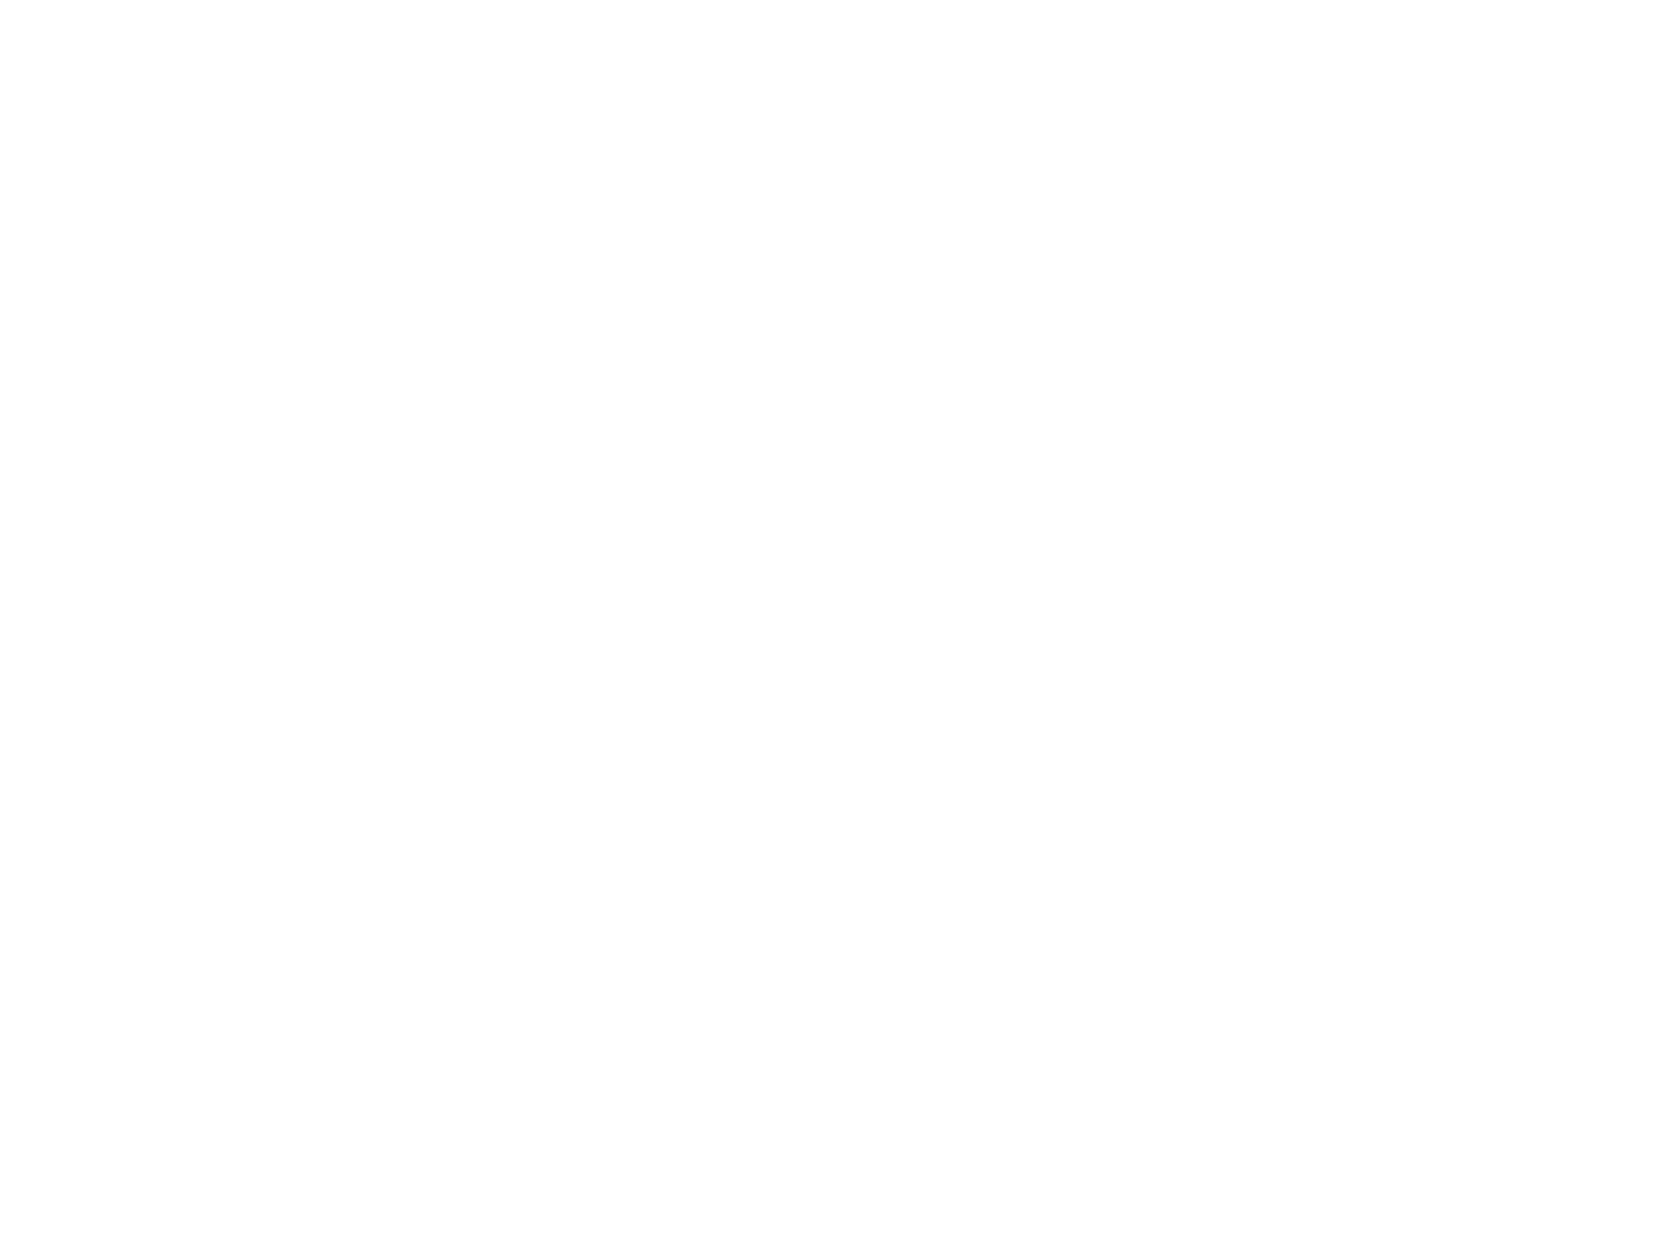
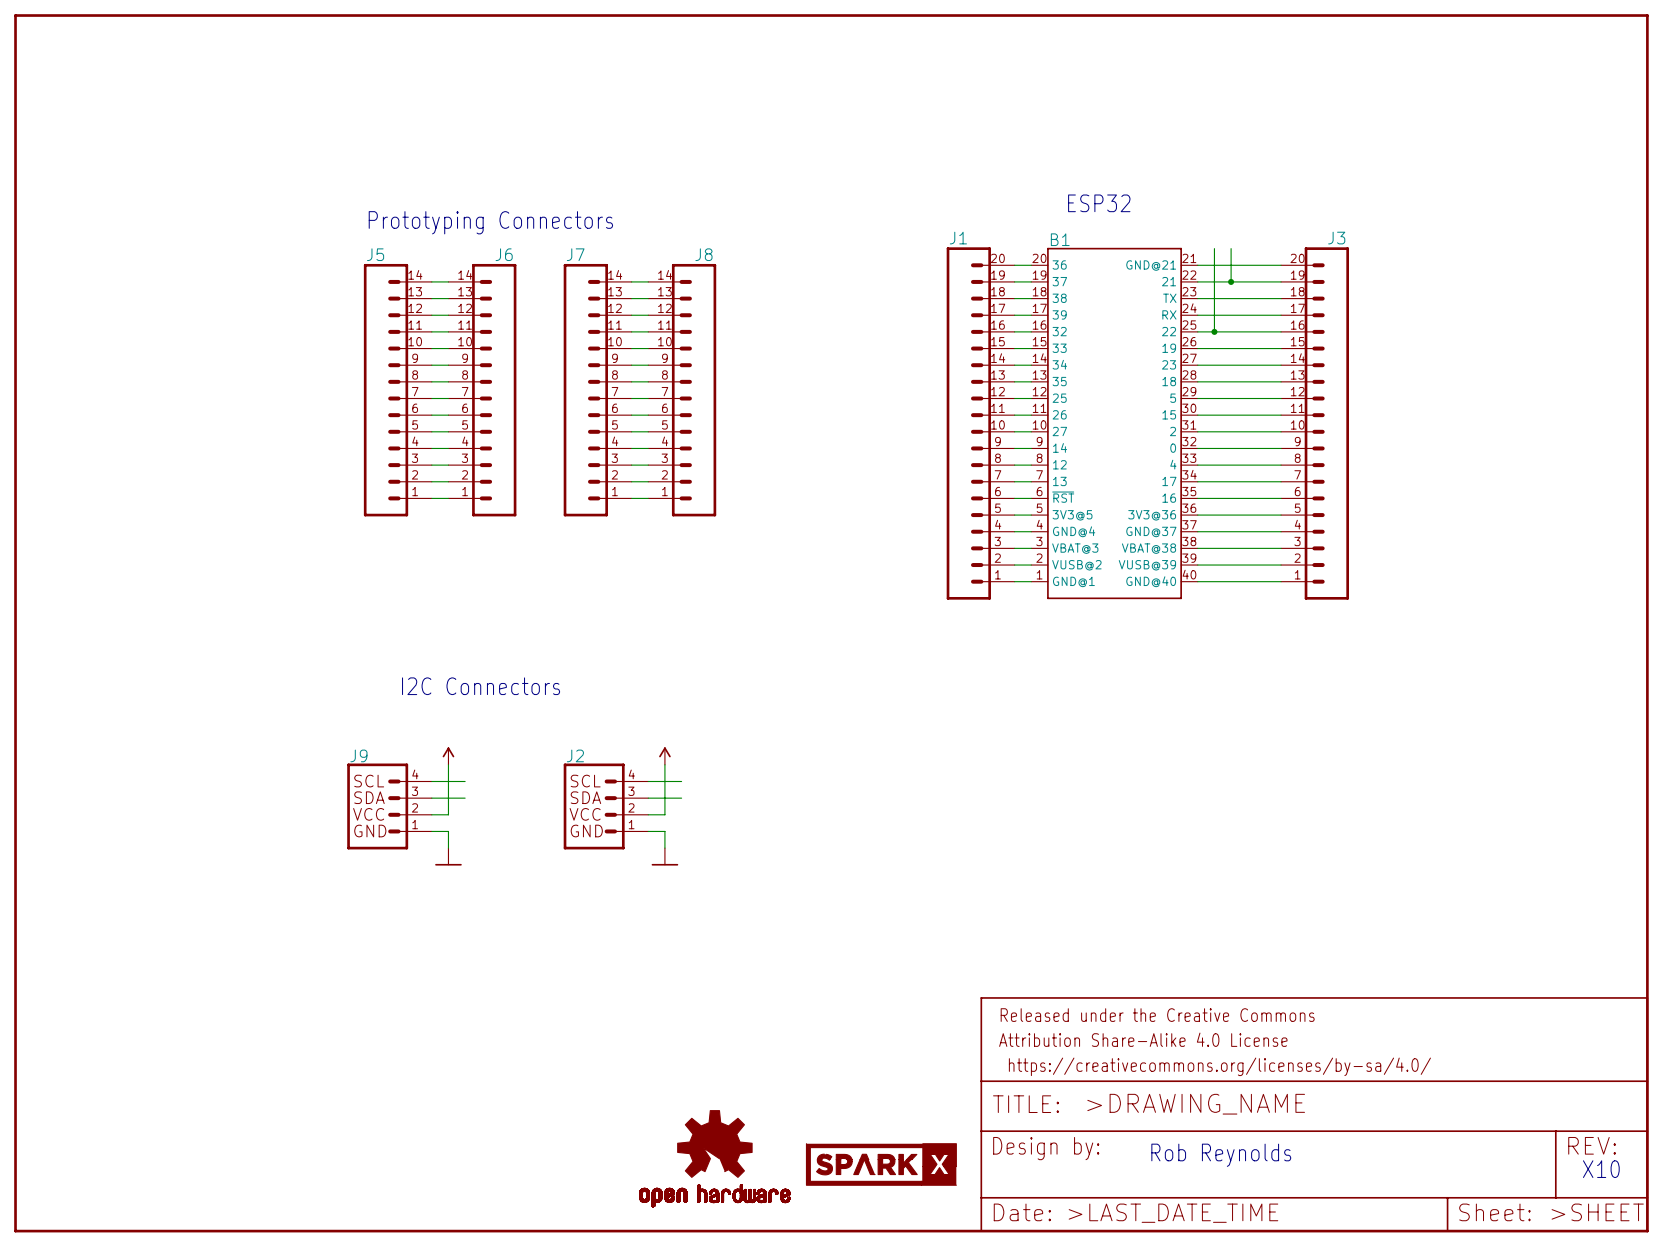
text: none -> ESP32 (1099, 203)
text: none -> Prototyping Connectors (490, 222)
wire: none -> (1214, 248) (1214, 331)
wire: none -> (1231, 248) (1231, 281)
wire: none -> (1014, 265) (1031, 265)
wire: none -> (1197, 265) (1281, 265)
wire: none -> (431, 281) (448, 281)
wire: none -> (631, 281) (648, 281)
wire: none -> (1014, 281) (1031, 281)
wire: none -> (1197, 281) (1281, 281)
junction: none -> (1231, 281)
wire: none -> (431, 298) (448, 298)
wire: none -> (631, 298) (648, 298)
wire: none -> (1014, 298) (1031, 298)
wire: none -> (1197, 298) (1281, 298)
wire: none -> (431, 315) (448, 315)
wire: none -> (631, 315) (648, 315)
wire: none -> (1014, 315) (1031, 315)
wire: none -> (1197, 315) (1281, 315)
wire: none -> (431, 331) (448, 331)
wire: none -> (631, 331) (648, 331)
wire: none -> (1014, 331) (1031, 331)
wire: none -> (1197, 331) (1281, 331)
junction: none -> (1214, 331)
wire: none -> (431, 348) (448, 348)
wire: none -> (631, 348) (648, 348)
wire: none -> (1014, 348) (1031, 348)
wire: none -> (1197, 348) (1281, 348)
wire: none -> (431, 365) (448, 365)
wire: none -> (631, 365) (648, 365)
wire: none -> (1014, 365) (1031, 365)
wire: none -> (1197, 365) (1281, 365)
wire: none -> (431, 381) (448, 381)
wire: none -> (631, 381) (648, 381)
wire: none -> (1014, 381) (1031, 381)
wire: none -> (1197, 381) (1281, 381)
J5: none -> (397, 390)
J6: none -> (482, 390)
J7: none -> (597, 390)
J8: none -> (682, 390)
wire: none -> (431, 398) (448, 398)
wire: none -> (631, 398) (648, 398)
wire: none -> (1014, 398) (1031, 398)
wire: none -> (1197, 398) (1281, 398)
wire: none -> (431, 415) (448, 415)
wire: none -> (631, 415) (648, 415)
wire: none -> (1014, 415) (1031, 415)
wire: none -> (1197, 415) (1281, 415)
J1: none -> (980, 423)
B1: none -> (1114, 423)
J3: none -> (1315, 423)
wire: none -> (431, 431) (448, 431)
wire: none -> (631, 431) (648, 431)
wire: none -> (1014, 431) (1031, 431)
wire: none -> (1197, 431) (1281, 431)
wire: none -> (431, 448) (448, 448)
wire: none -> (631, 448) (648, 448)
wire: none -> (1014, 448) (1031, 448)
wire: none -> (1197, 448) (1281, 448)
wire: none -> (431, 465) (448, 465)
wire: none -> (631, 465) (648, 465)
wire: none -> (1014, 465) (1031, 465)
wire: none -> (1197, 465) (1281, 465)
wire: none -> (431, 481) (448, 481)
wire: none -> (631, 481) (648, 481)
wire: none -> (1014, 481) (1031, 481)
wire: none -> (1197, 481) (1281, 481)
wire: none -> (431, 498) (448, 498)
wire: none -> (631, 498) (648, 498)
wire: none -> (1014, 498) (1031, 498)
wire: none -> (1197, 498) (1281, 498)
wire: none -> (1014, 515) (1031, 515)
wire: none -> (1197, 515) (1281, 515)
wire: none -> (1014, 531) (1031, 531)
wire: none -> (1197, 531) (1281, 531)
wire: none -> (1014, 548) (1031, 548)
wire: none -> (1197, 548) (1281, 548)
wire: none -> (1014, 565) (1031, 565)
wire: none -> (1197, 565) (1281, 565)
wire: none -> (1014, 581) (1031, 581)
wire: none -> (1197, 581) (1281, 581)
part: none -> (831, 623)
text: none -> I2C Connectors (481, 686)
power symbol: none -> (448, 756)
power symbol: none -> (664, 756)
wire: none -> (448, 764) (448, 814) (431, 814)
wire: none -> (664, 764) (664, 814) (648, 814)
wire: none -> (431, 781) (465, 781)
wire: none -> (648, 781) (681, 781)
wire: none -> (431, 798) (465, 798)
wire: none -> (648, 798) (681, 798)
J9: none -> (389, 806)
J2: none -> (605, 806)
wire: none -> (431, 831) (448, 831) (448, 848)
wire: none -> (648, 831) (664, 831) (664, 848)
power symbol: none -> (448, 856)
power symbol: none -> (664, 856)
part: none -> (1314, 1114)
text: none -> Rob Reynolds (1221, 1155)
part: none -> (714, 1158)
part: none -> (881, 1164)
text: none -> X10 (1601, 1169)

